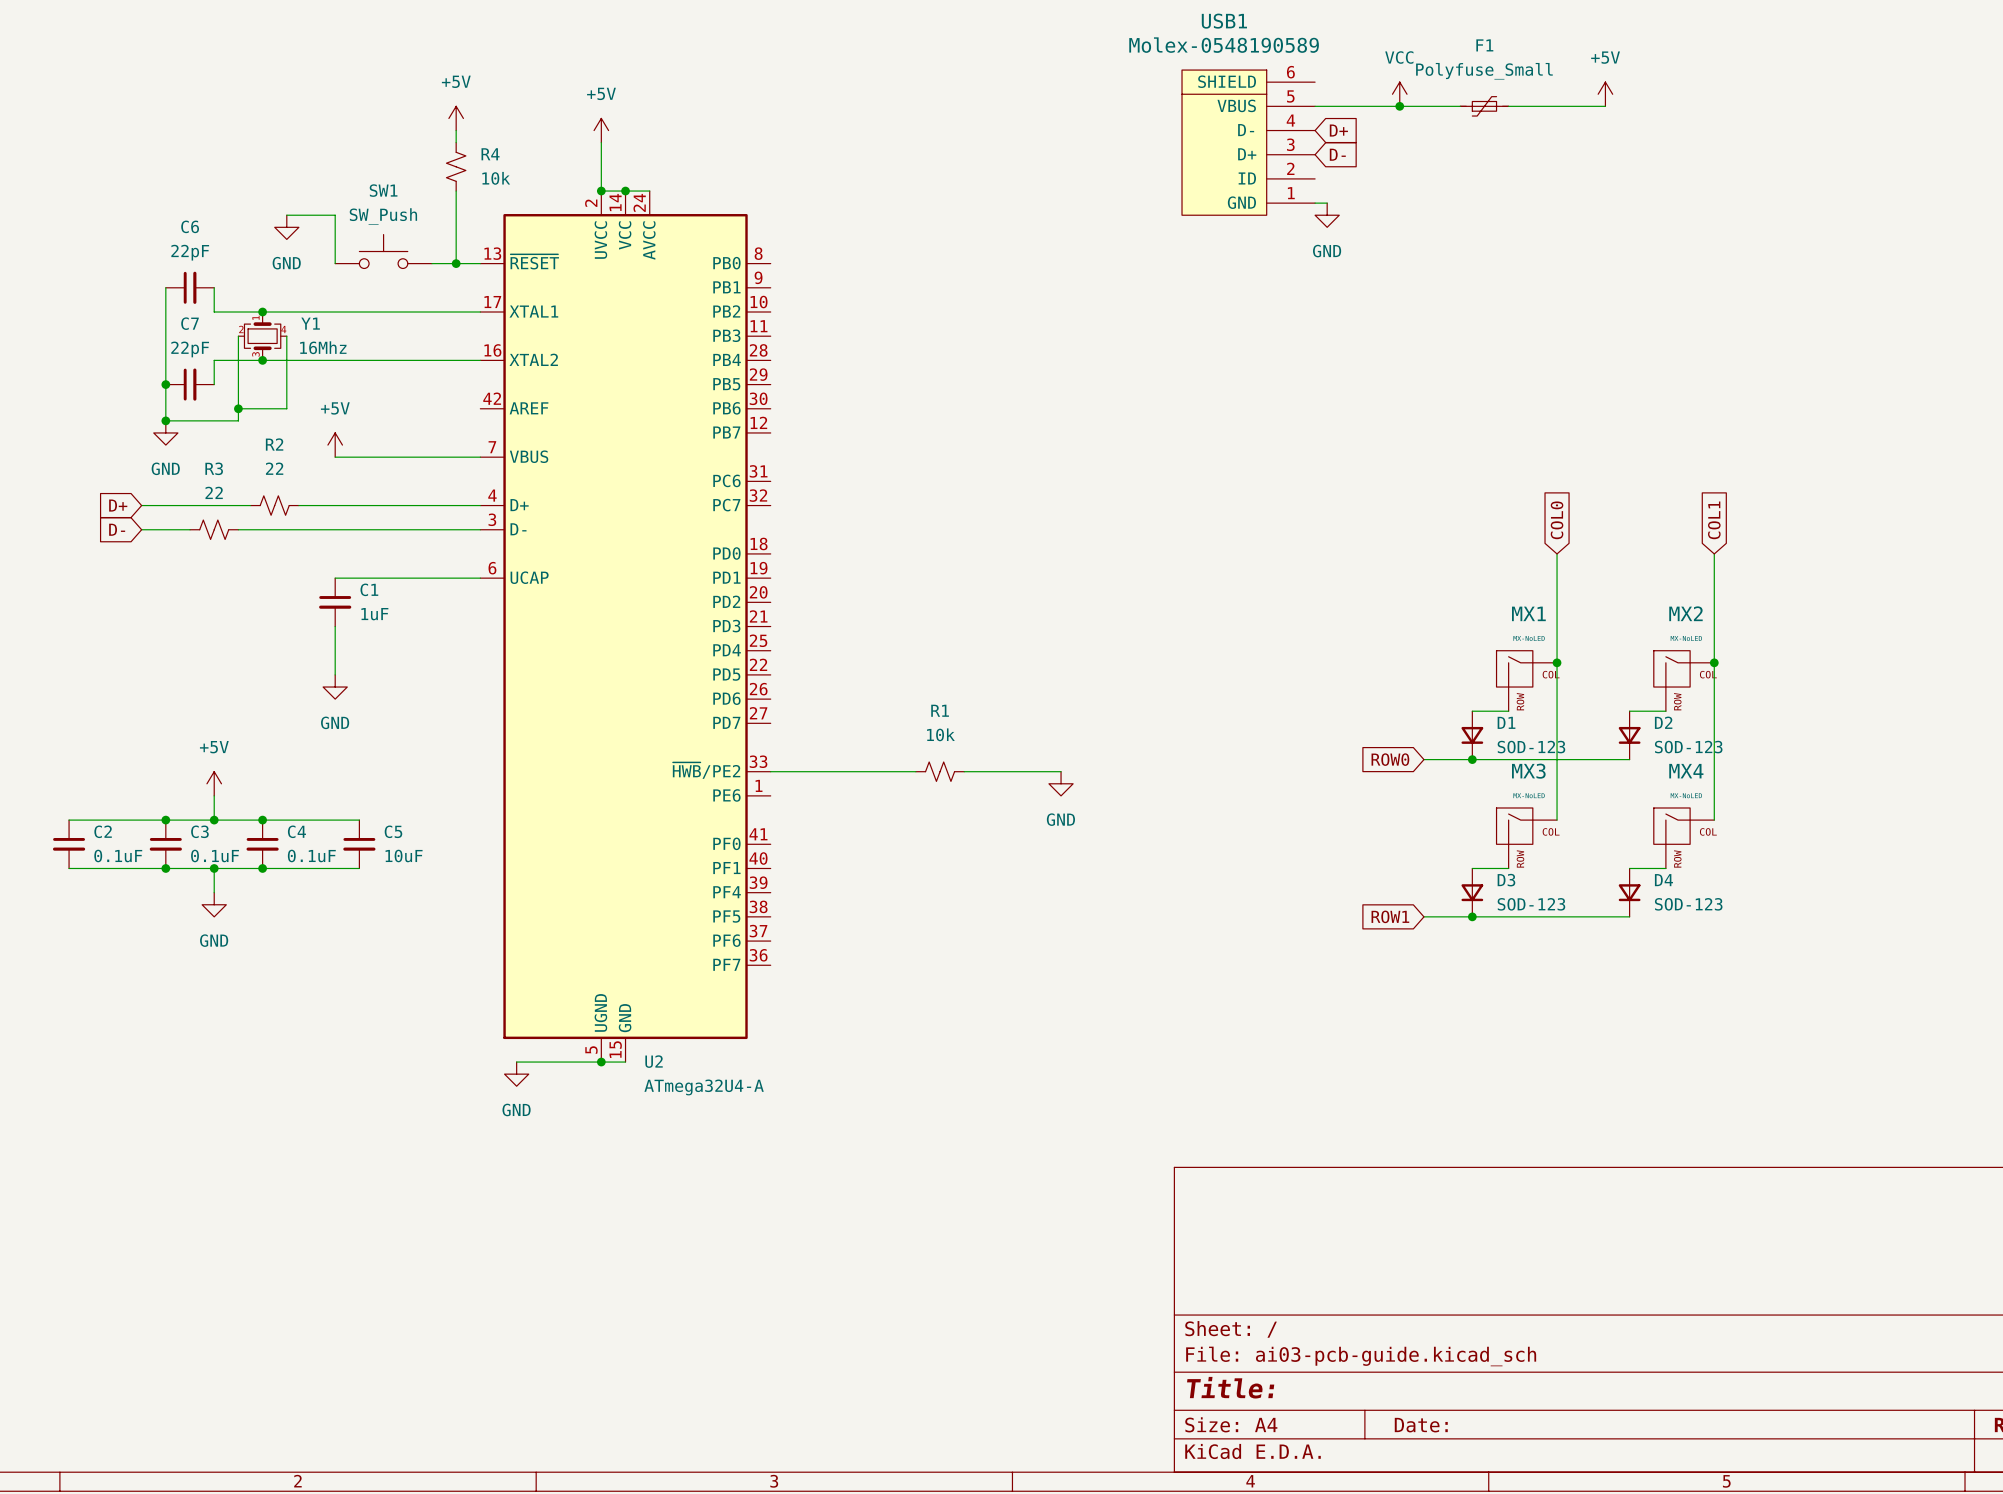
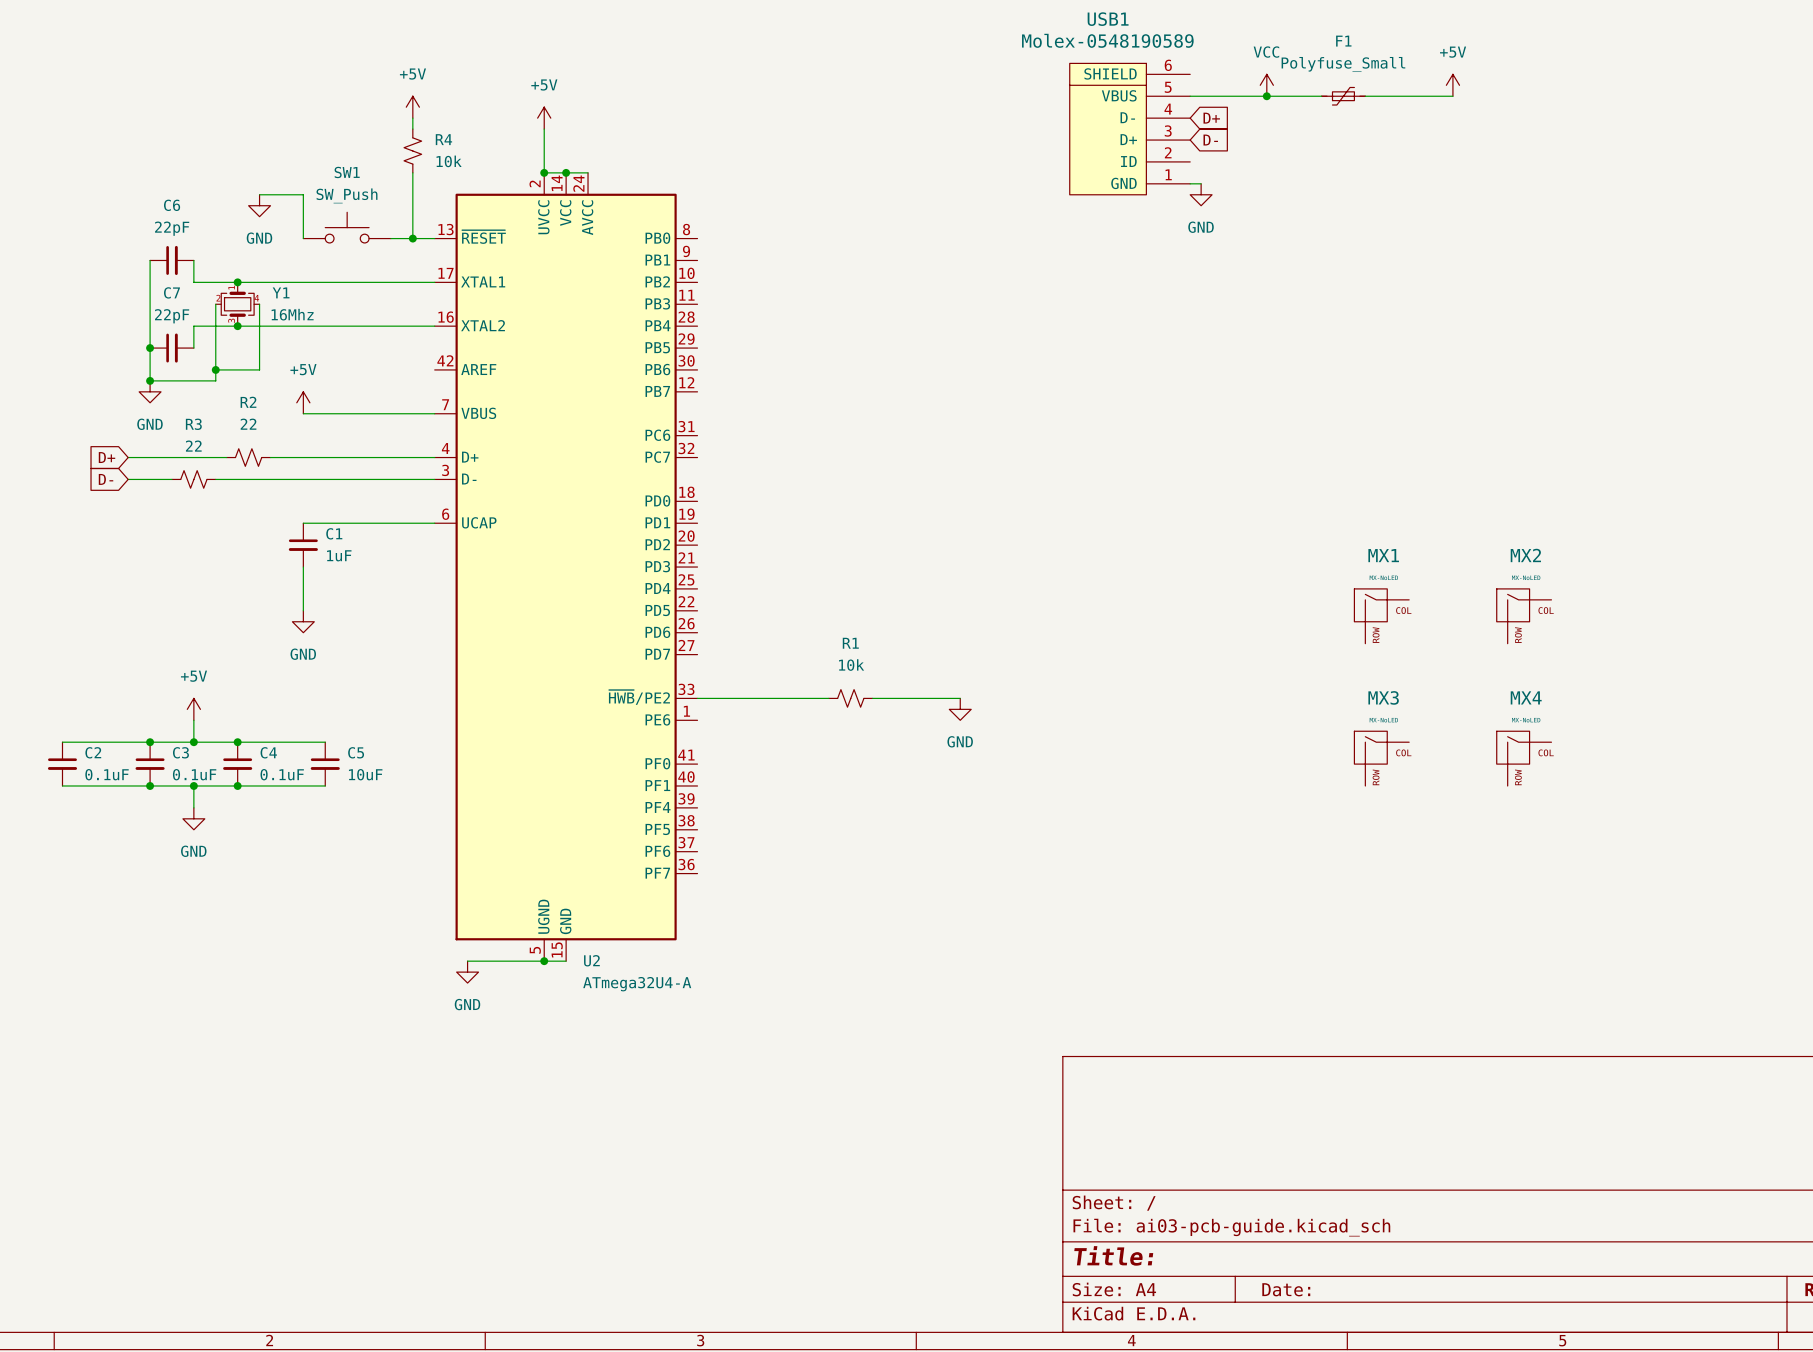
global label: COL0 (1557, 520) -> none
global label: COL1 (1714, 520) -> none
wire: (1557, 553) (1557, 820) -> none
wire: (1714, 553) (1714, 820) -> none
junction: (1557, 662) -> none
junction: (1714, 662) -> none
wire: (1472, 711) (1508, 711) -> none
wire: (1629, 711) (1665, 711) -> none
D1: SOD-123 (1472, 735) -> none
D2: SOD-123 (1629, 735) -> none
global label: ROW0 (1390, 759) -> none
wire: (1423, 759) (1629, 759) -> none
junction: (1472, 759) -> none
wire: (1472, 868) (1508, 868) -> none
wire: (1629, 868) (1665, 868) -> none
D3: SOD-123 (1472, 892) -> none
D4: SOD-123 (1629, 892) -> none
global label: ROW1 (1390, 916) -> none
wire: (1423, 916) (1629, 916) -> none
junction: (1472, 916) -> none

